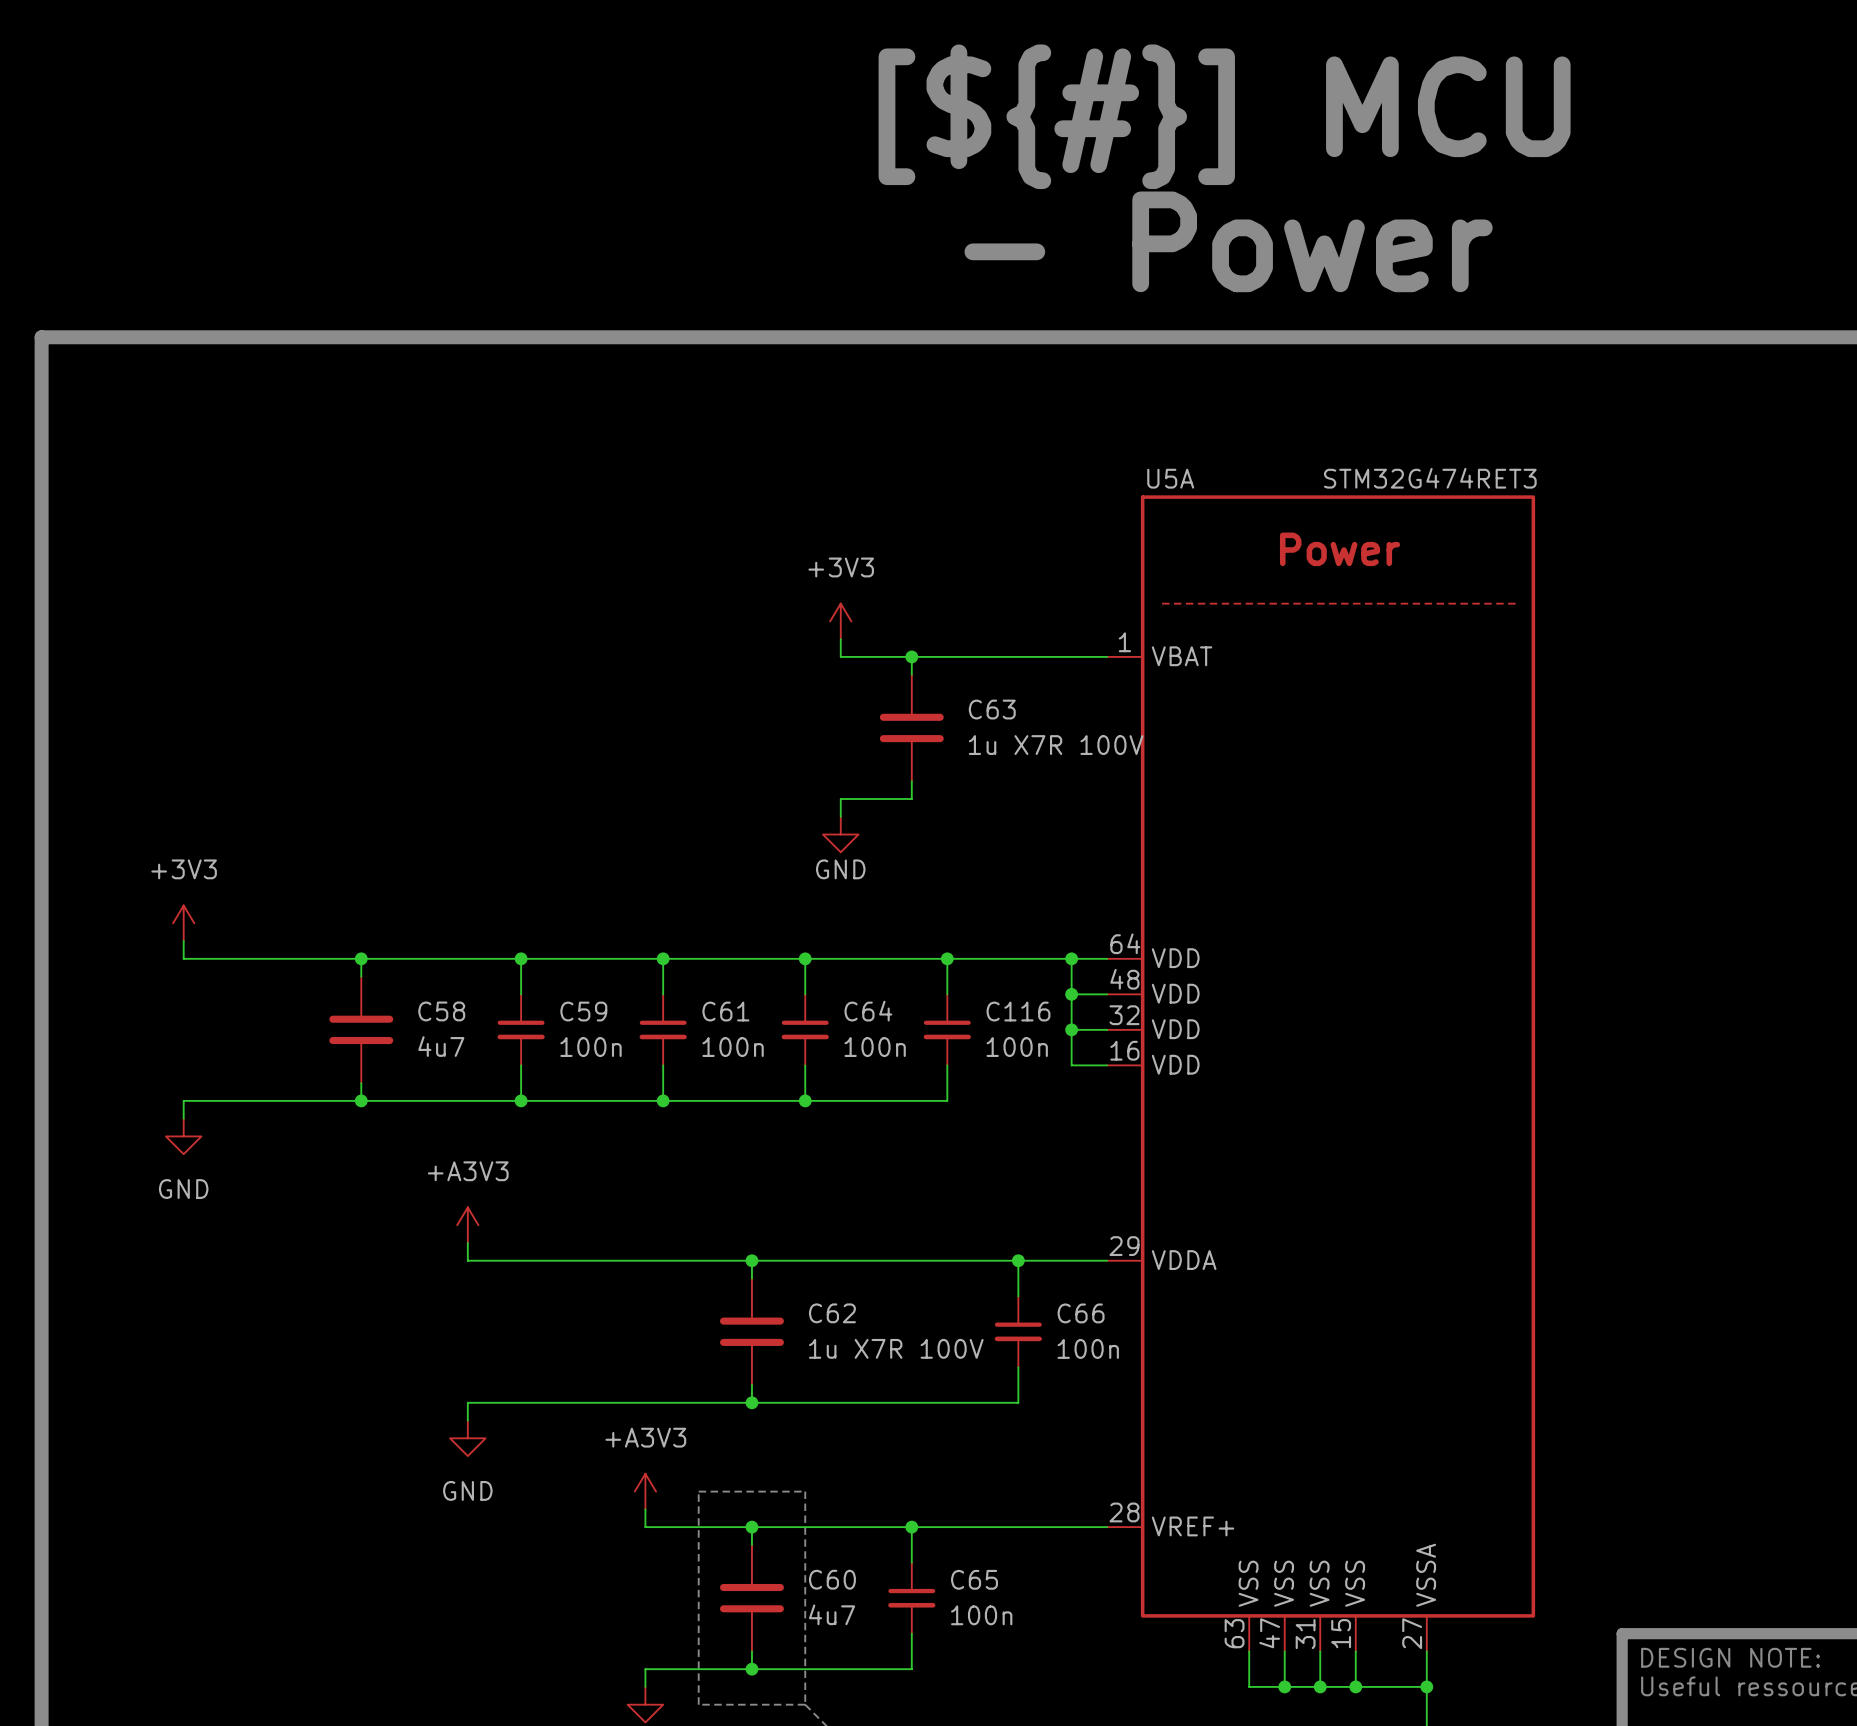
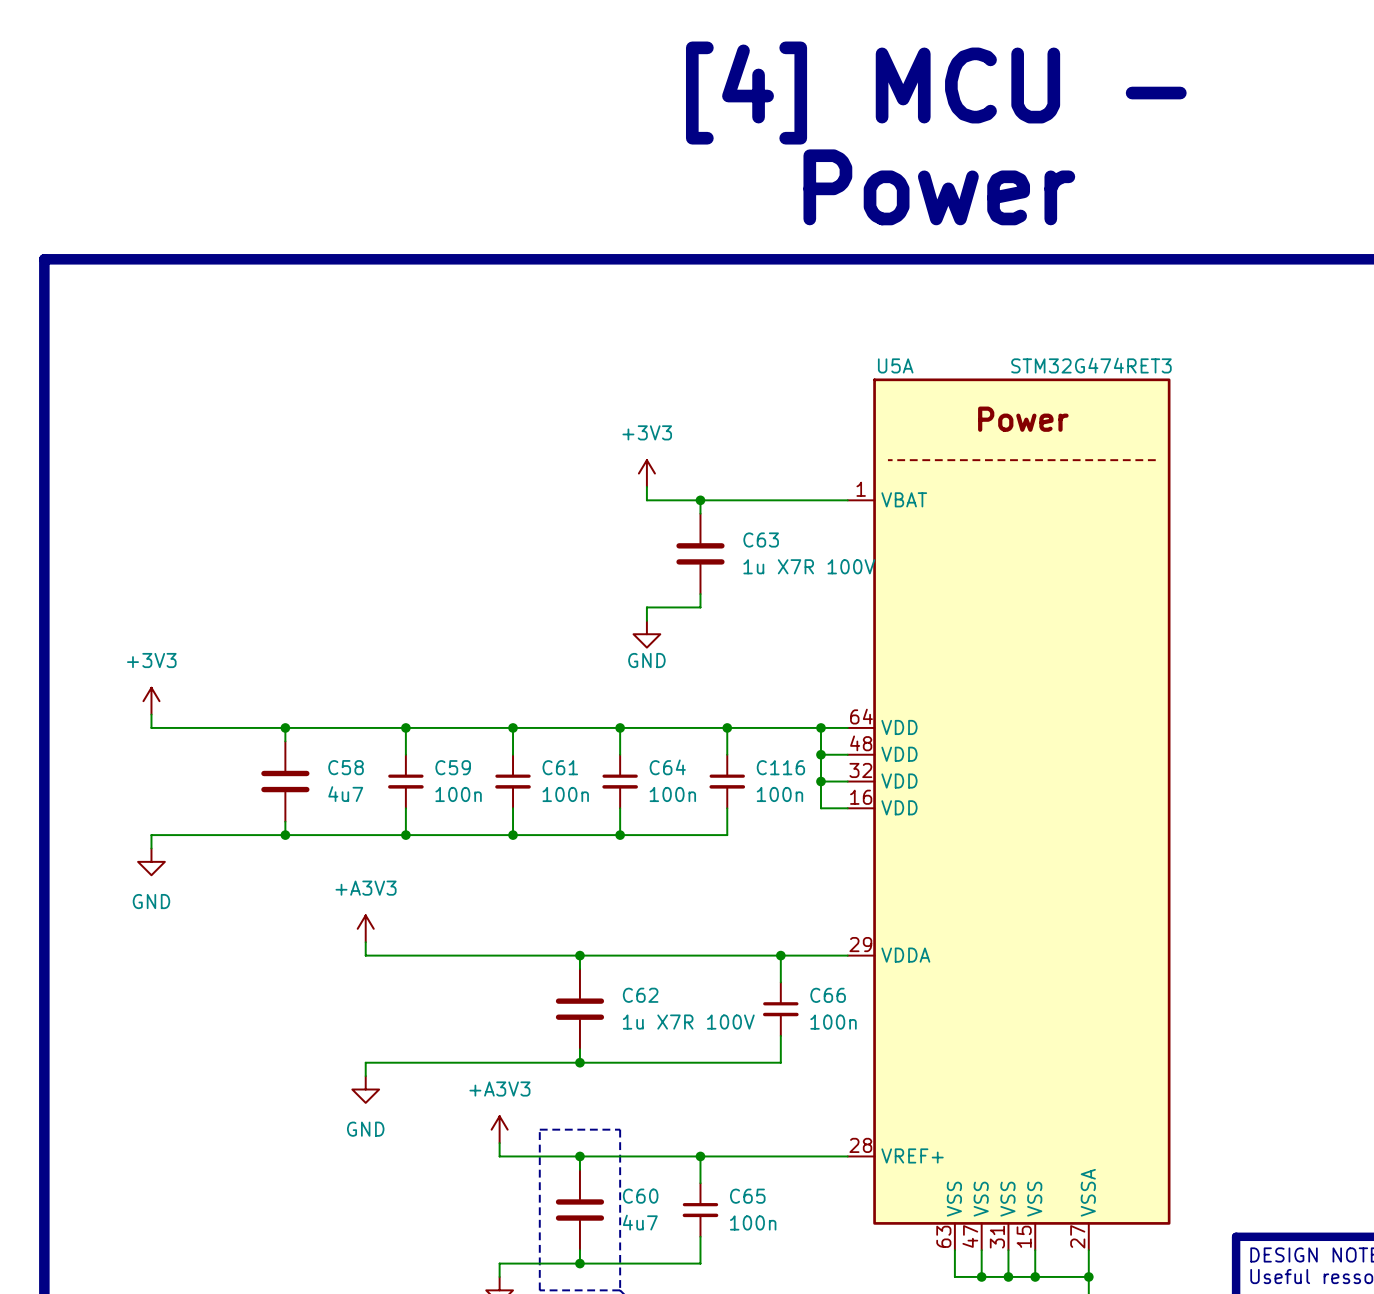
text: [${#}] MCU (1224, 116) -> [4] MCU - (936, 93)
text: - Power (1228, 241) -> Power (939, 187)

